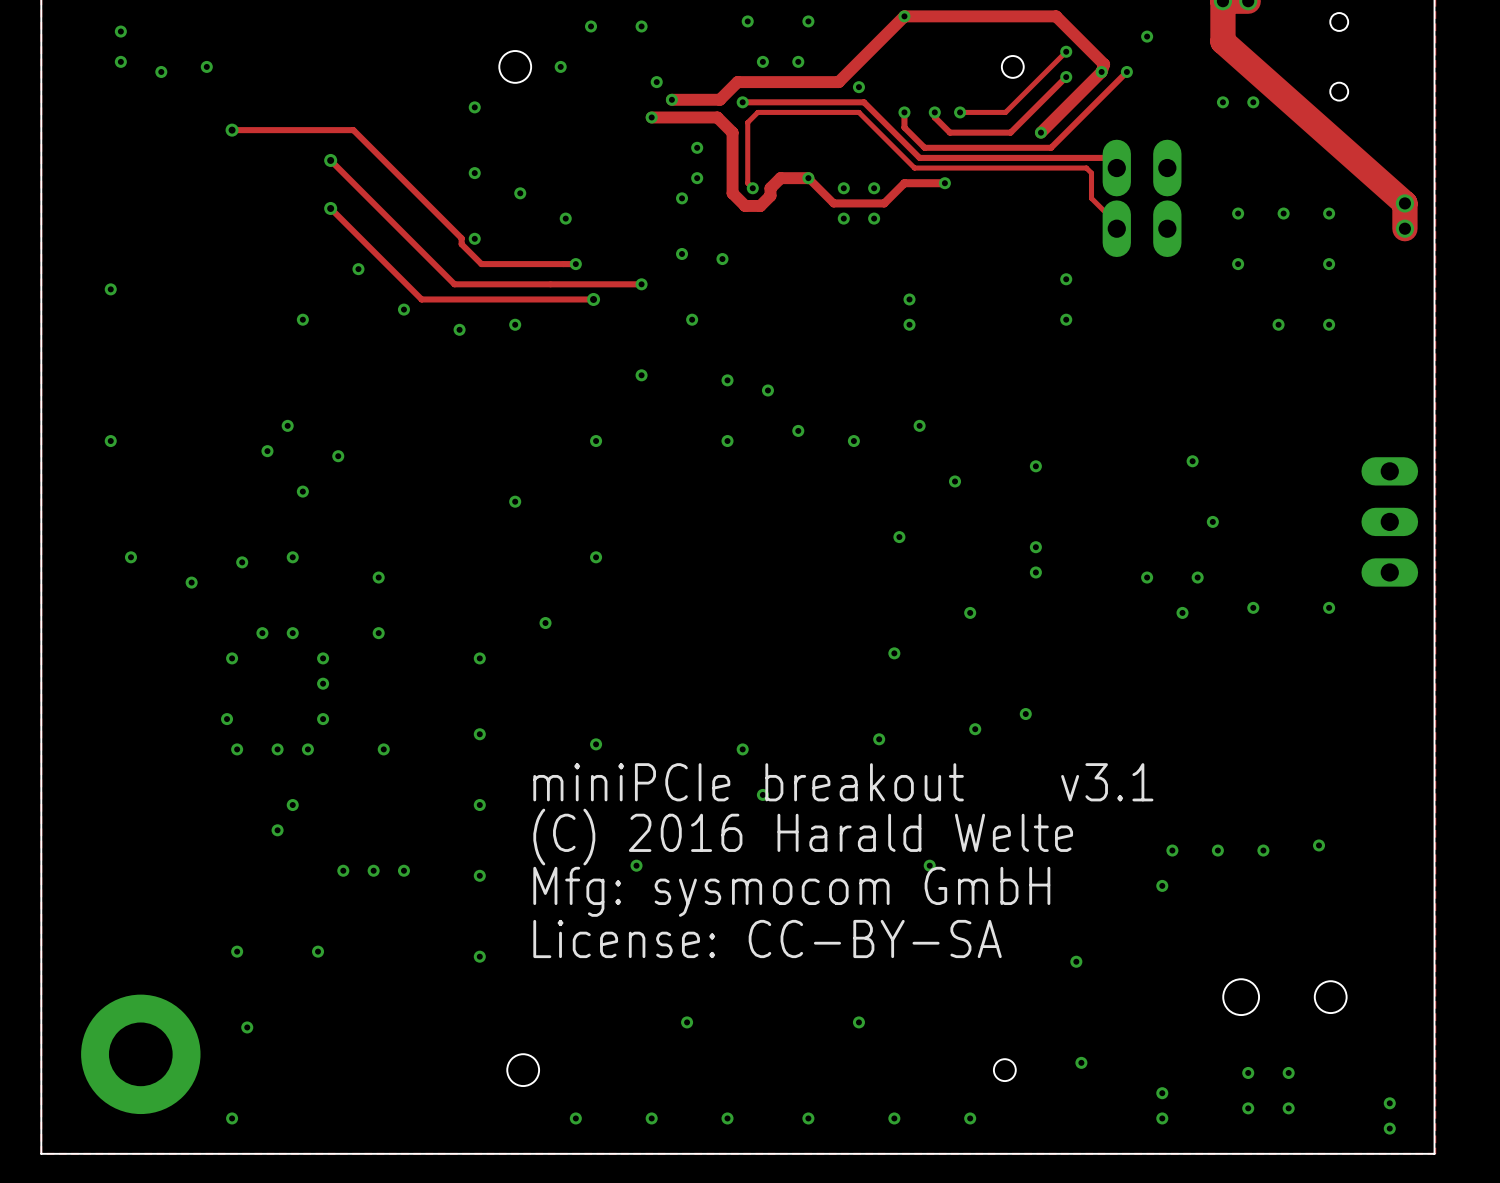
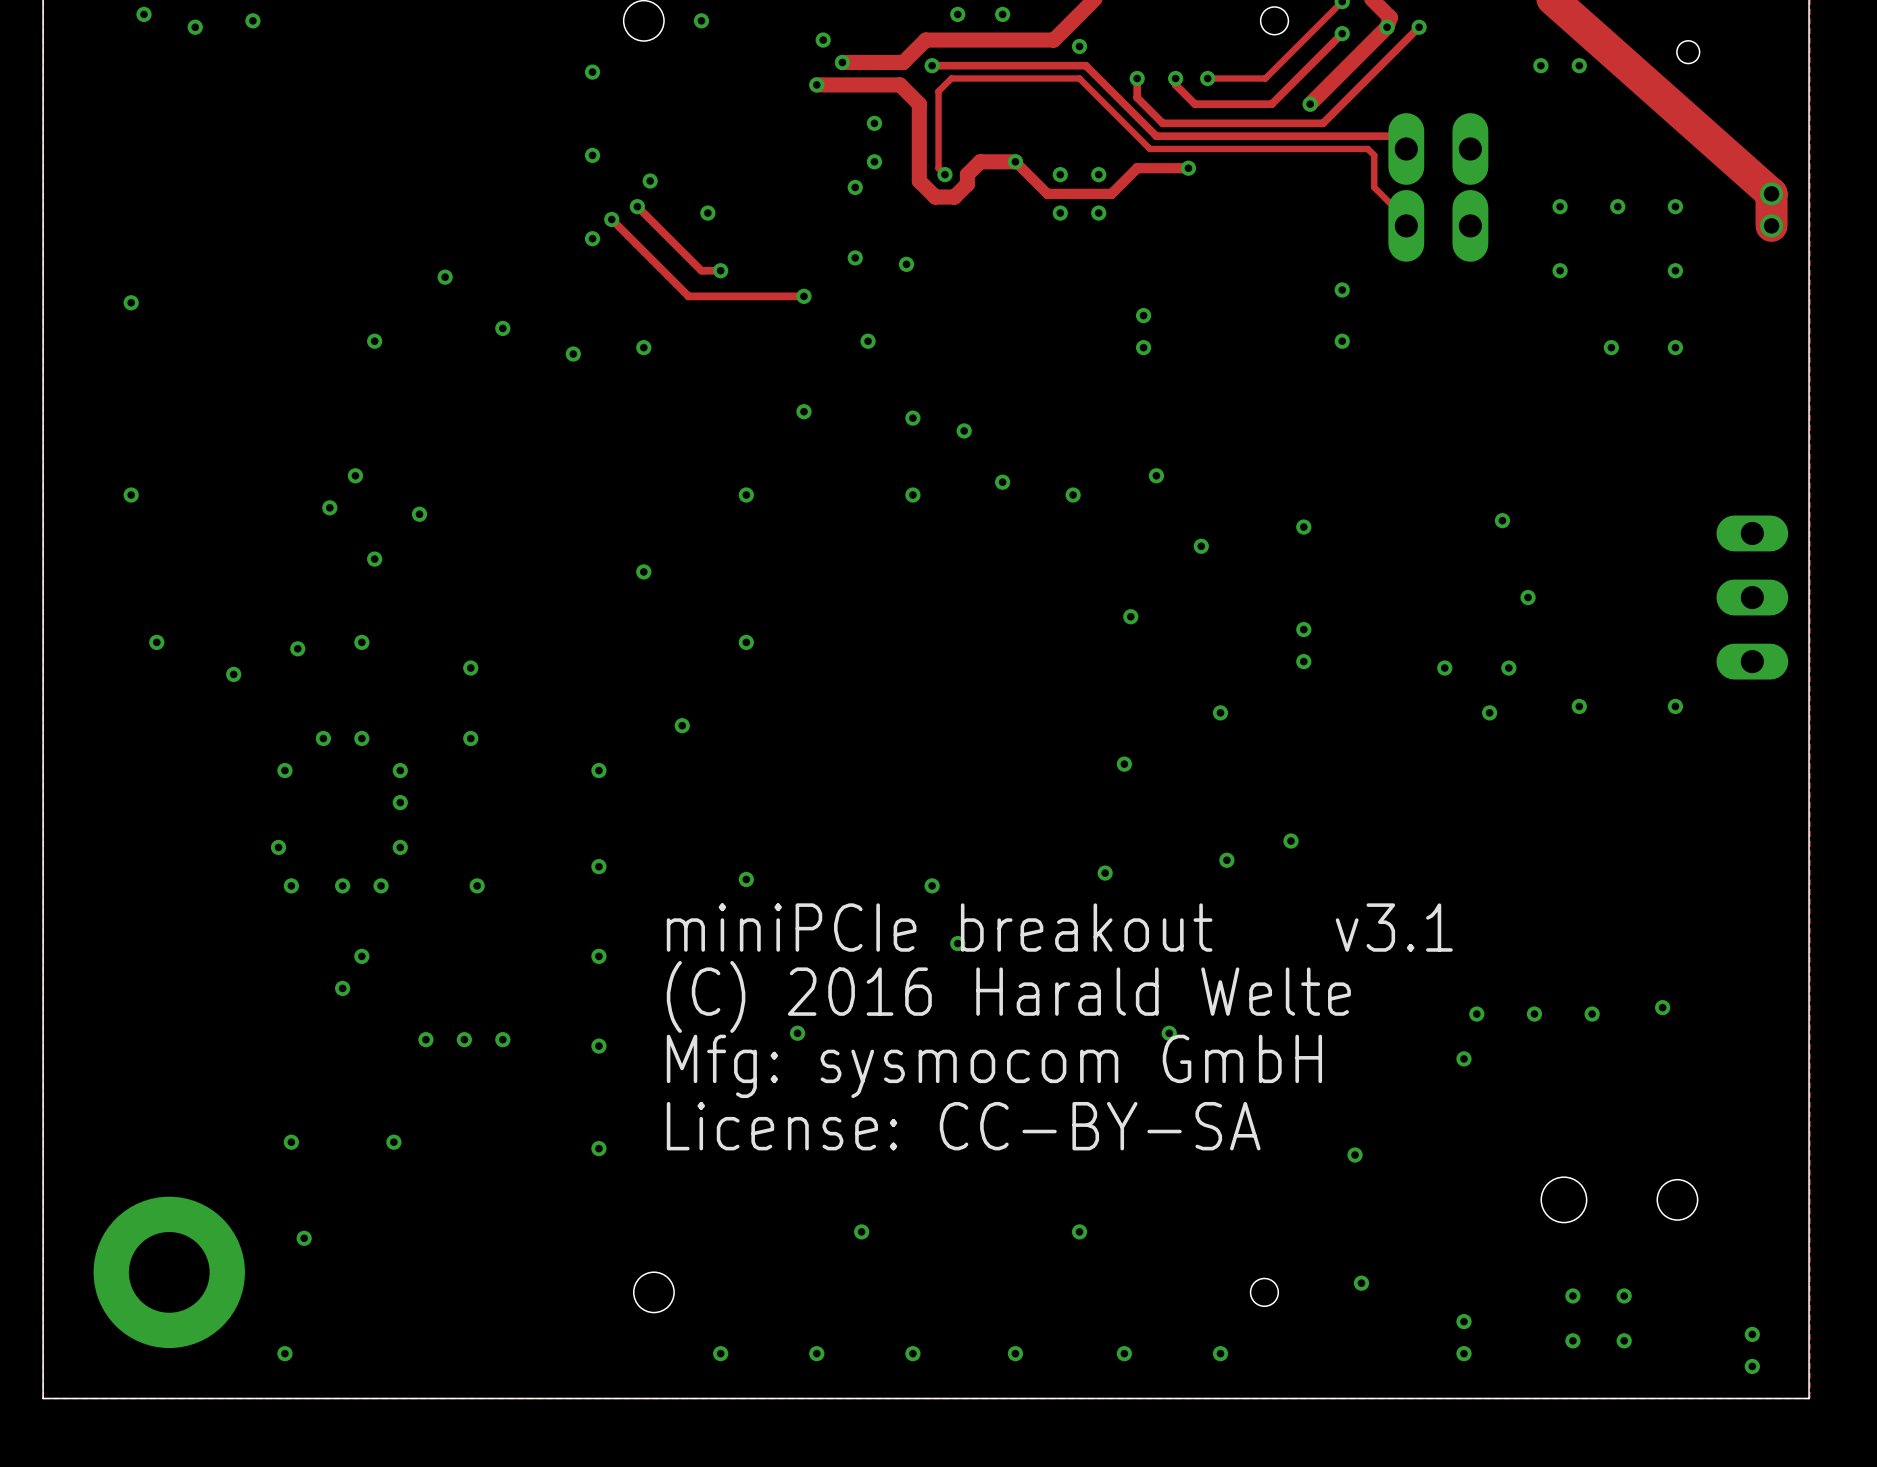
track: (232, 130) (353, 130) (461, 238) (461, 244) (481, 264) (560, 264) -> (637, 206) (701, 270)
via: (232, 130) -> none
track: (330, 160) (454, 284) (550, 284) -> (611, 219) (688, 296)
via: (330, 160) -> none
track: (330, 208) (421, 299) (593, 299) -> none
via: (330, 208) -> none
via: none -> (637, 206)
via: none -> (611, 219)
via: (593, 299) -> none

